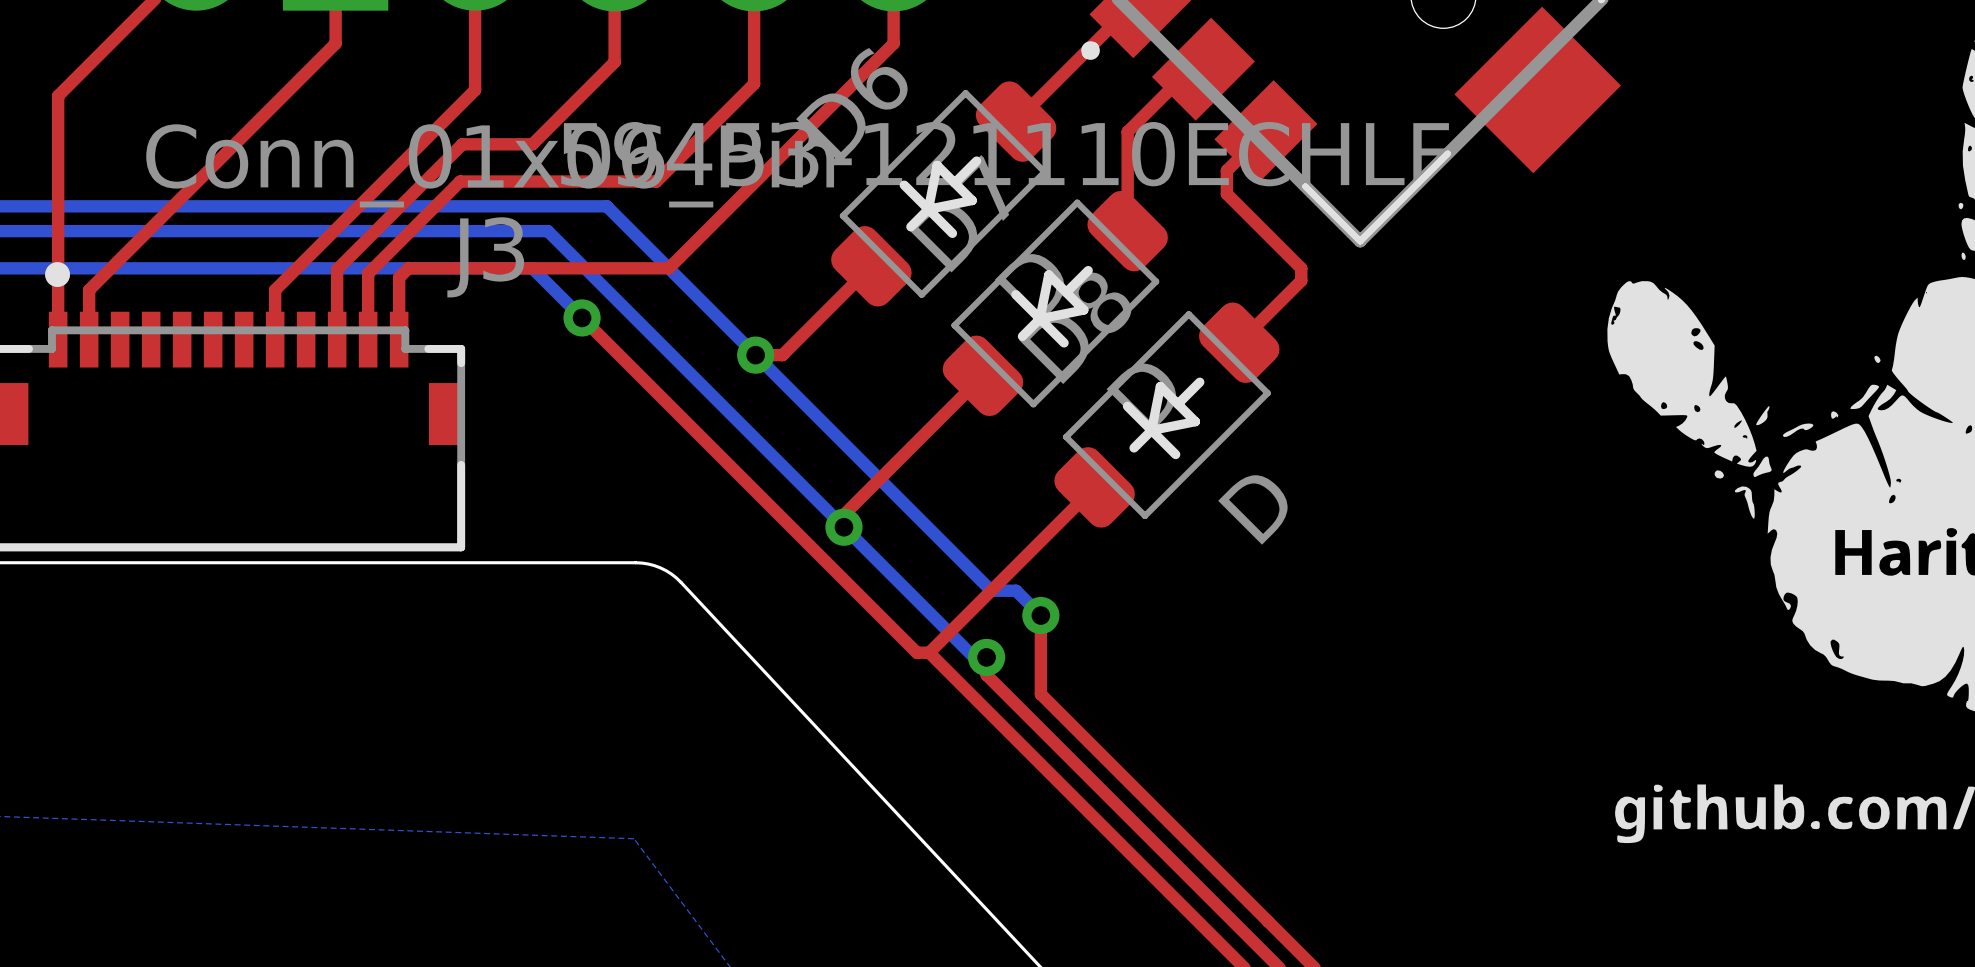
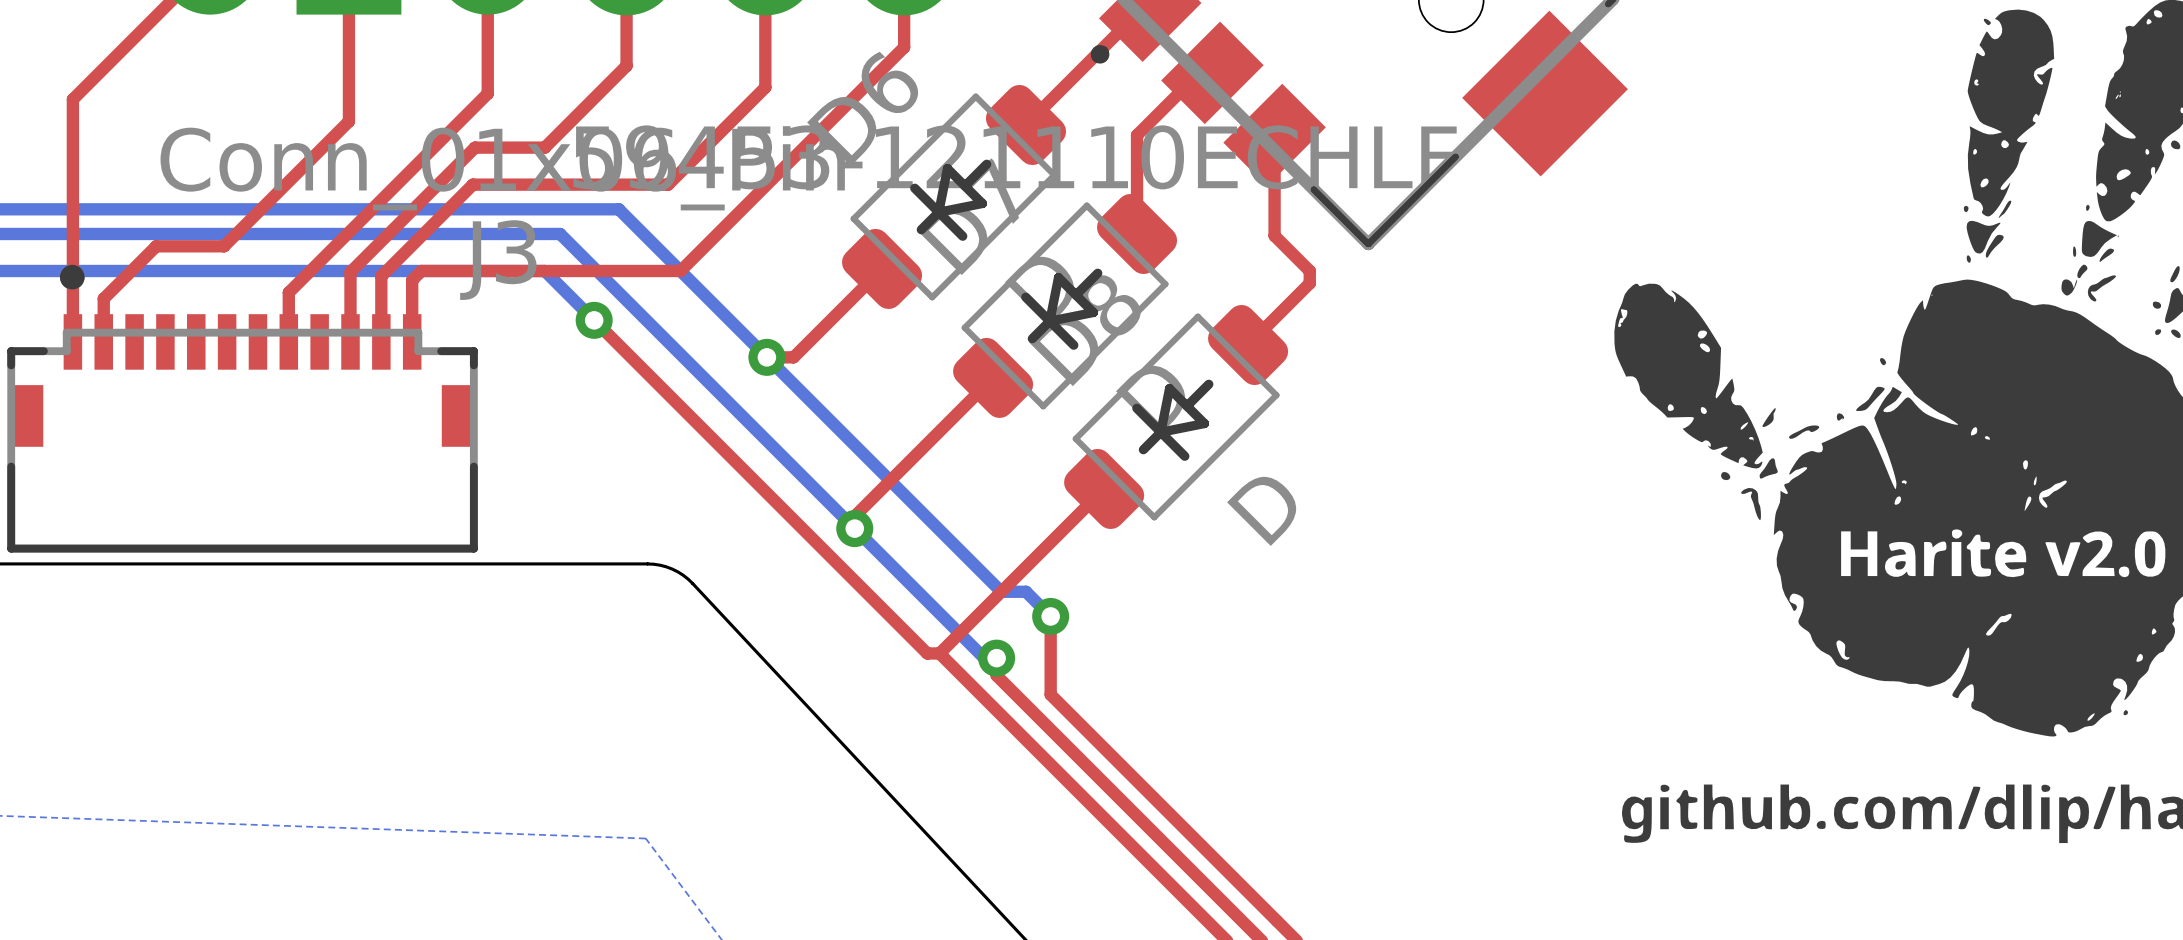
top track: (335, 43) (89, 290) (89, 296) -> (348, 47) (348, 121) (224, 246) (156, 246) (103, 298)
top track: (1265, 131) (1226, 170) (1226, 193) (1265, 232) -> (1274, 135) (1274, 235)

